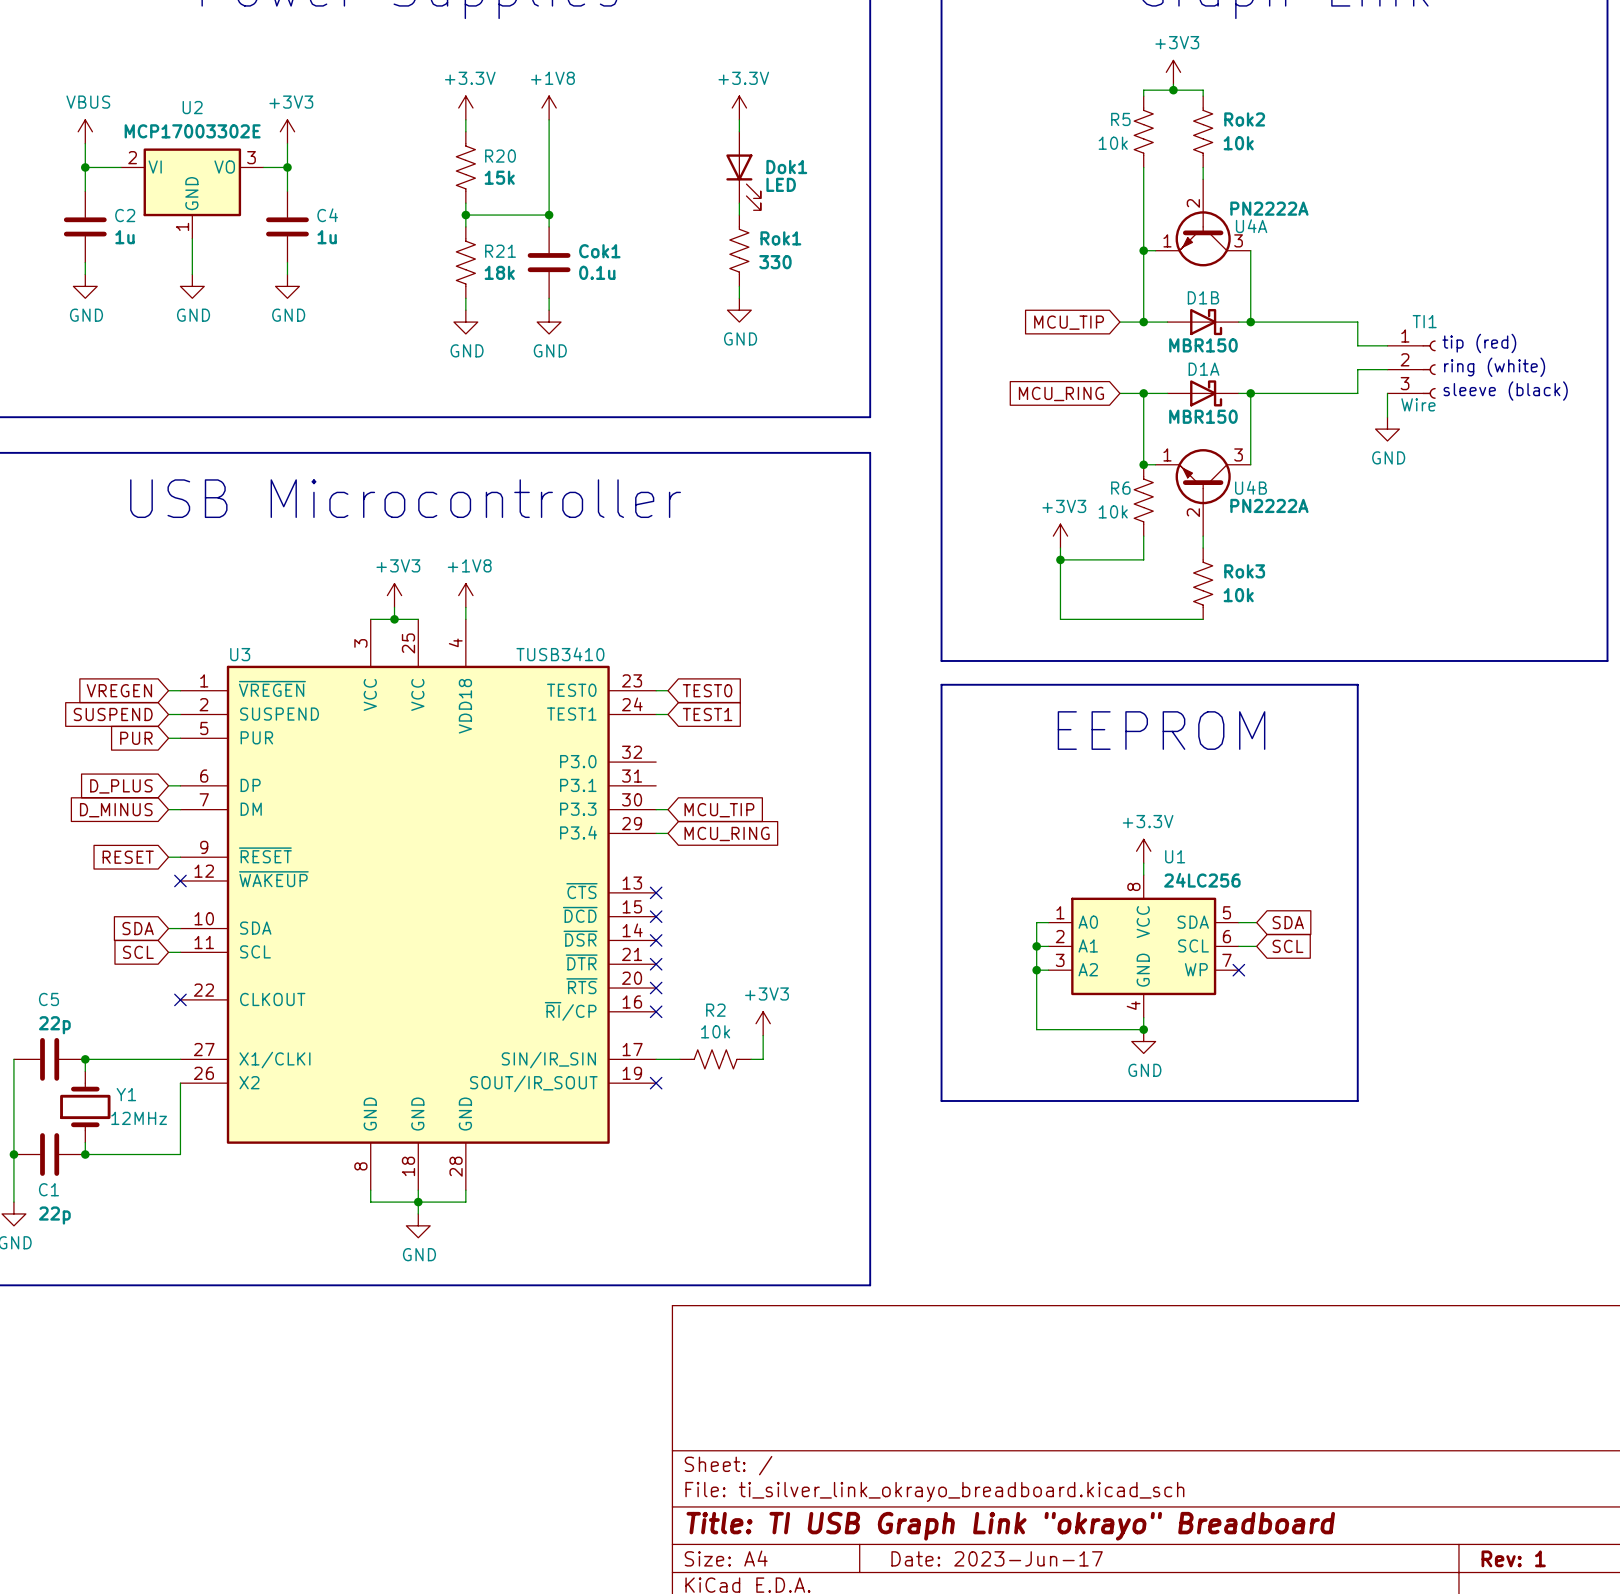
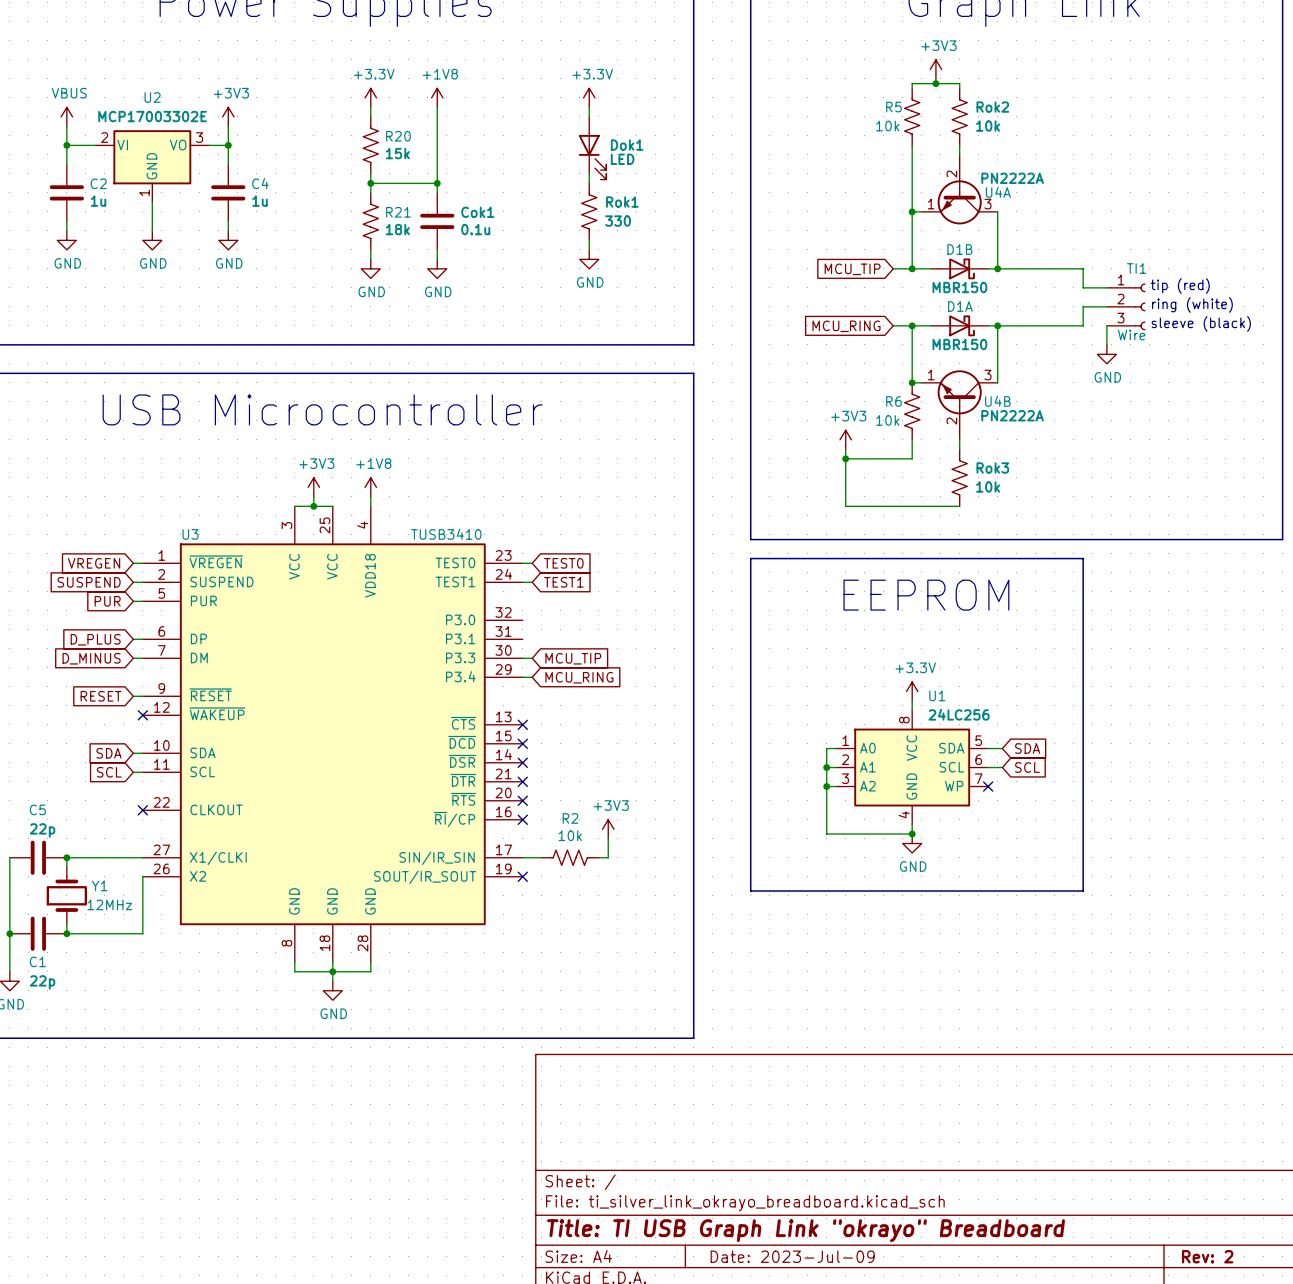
title block: Date: 2023-Jun-17 (997, 1558) -> Date: 2023-Jul-09 (792, 1256)
title block: Rev: 1 (1513, 1558) -> Rev: 2 (1207, 1256)

